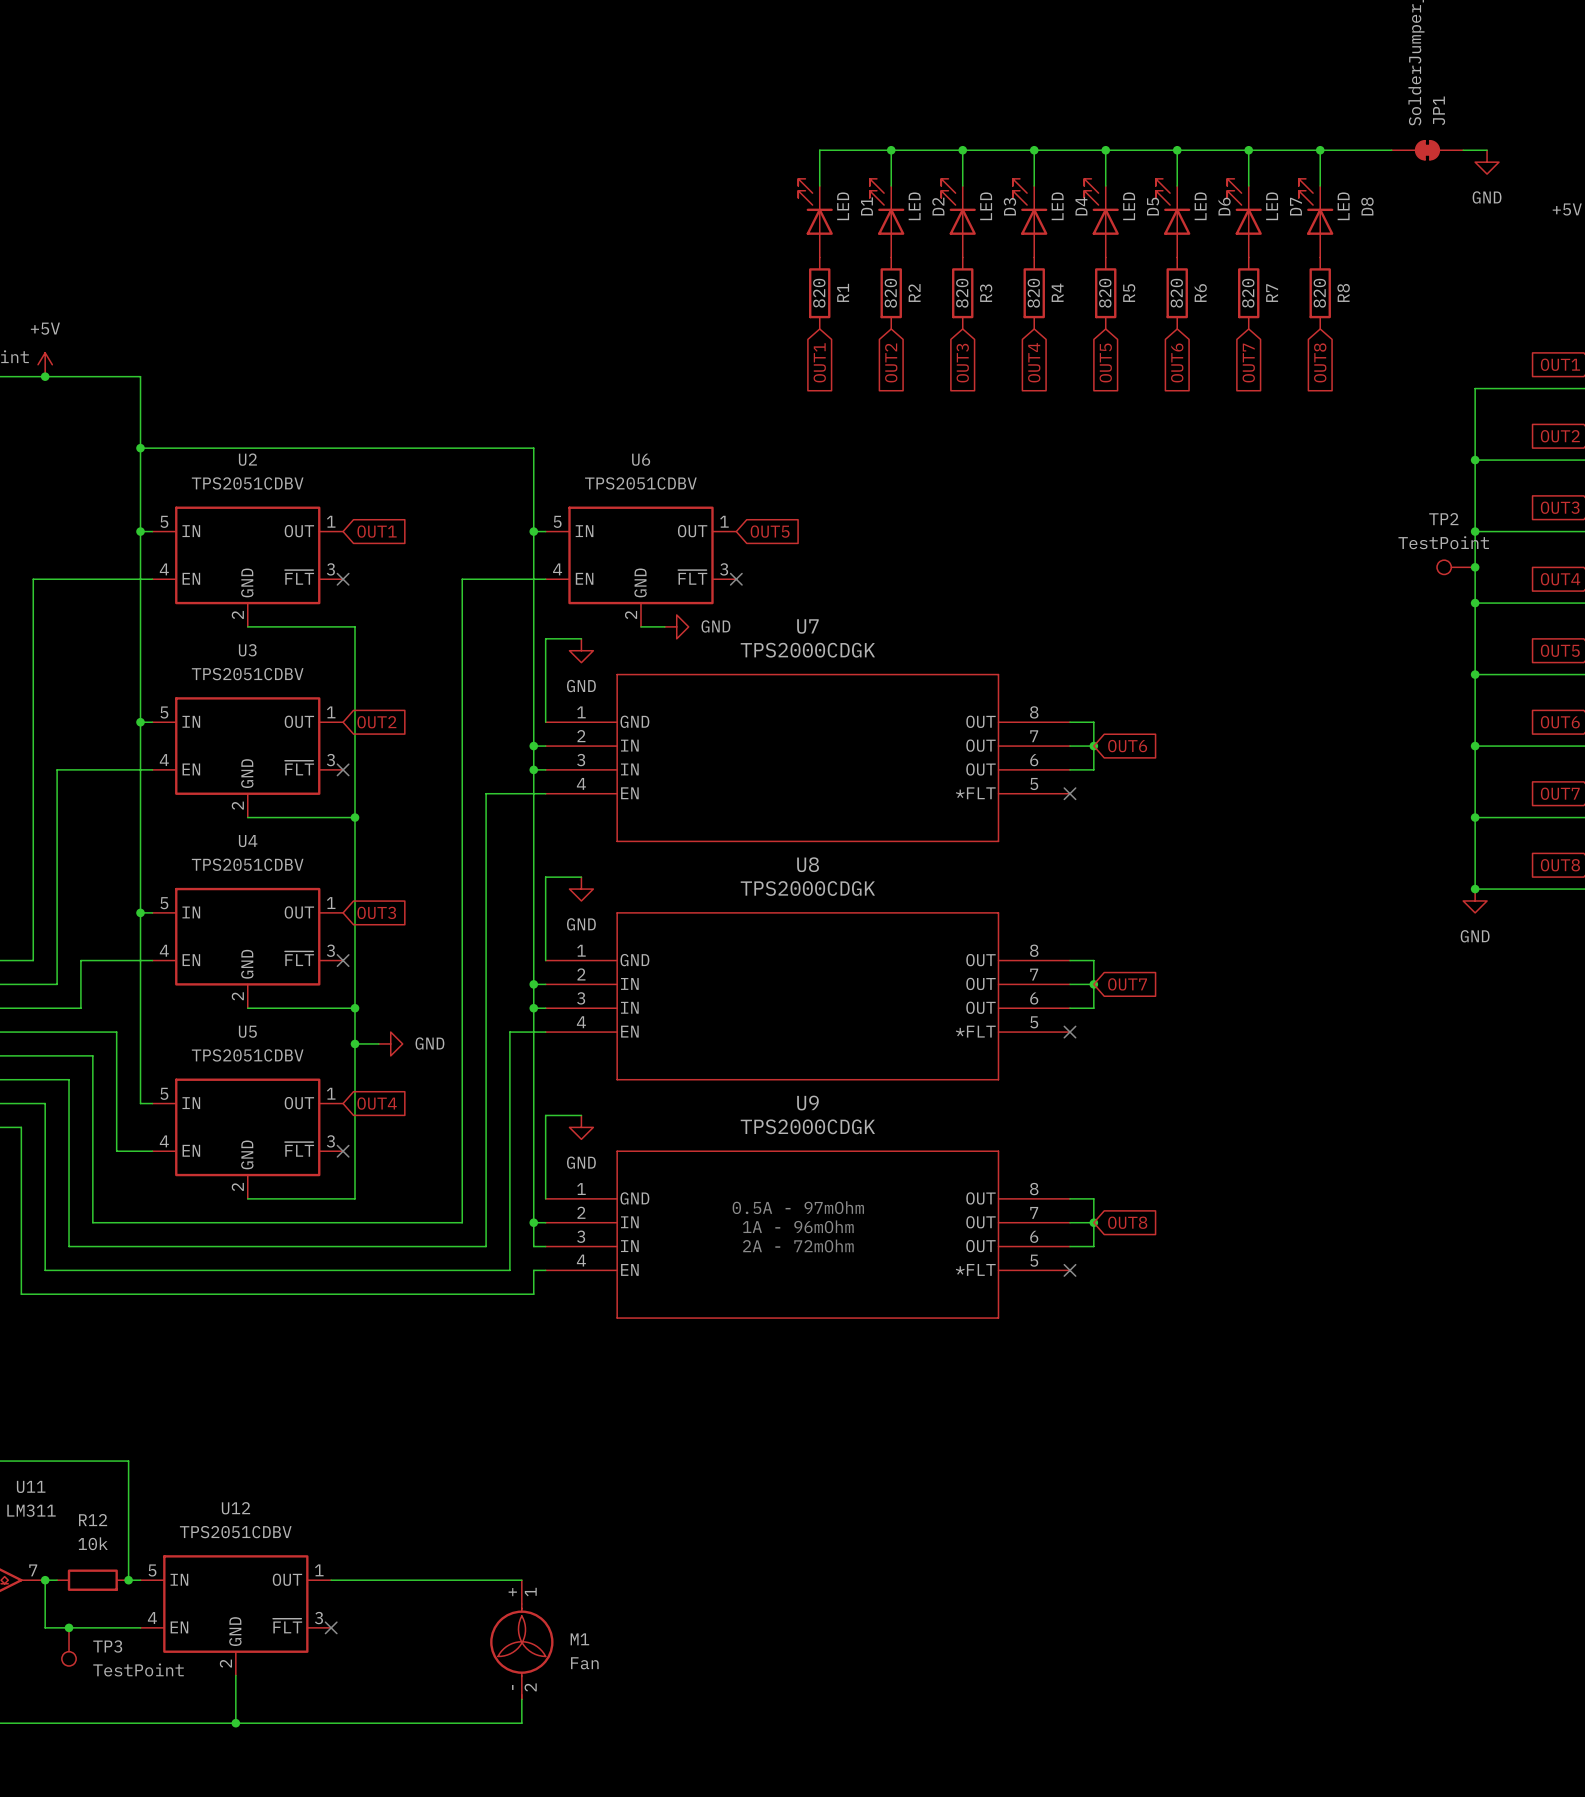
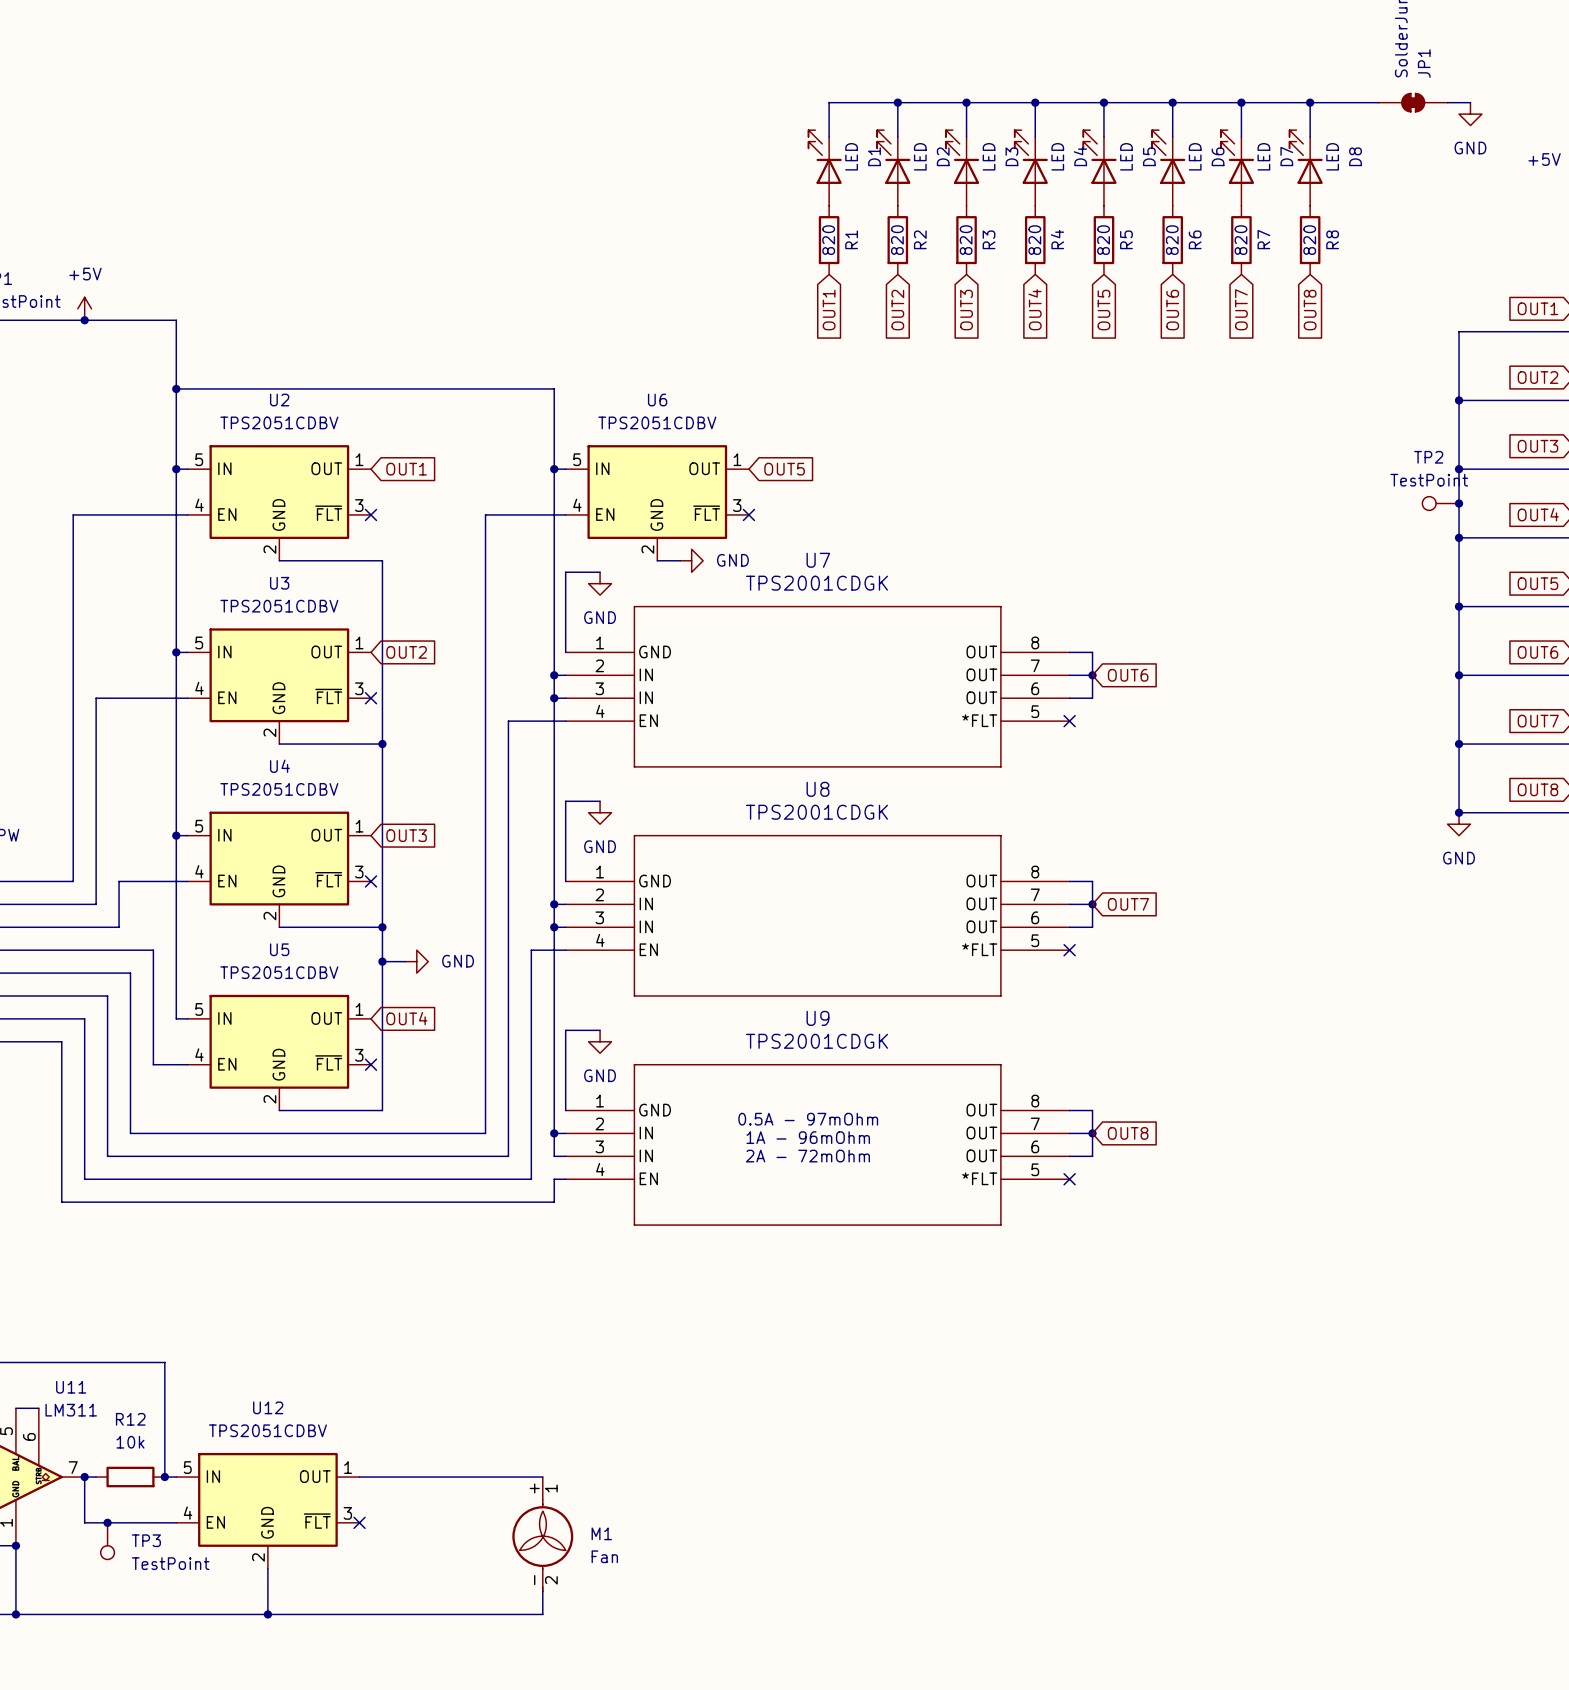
U7 value: TPS2000CDGK (807, 650) -> TPS2001CDGK (817, 583)
U8 value: TPS2000CDGK (807, 888) -> TPS2001CDGK (817, 812)
U9 value: TPS2000CDGK (807, 1126) -> TPS2001CDGK (817, 1041)

